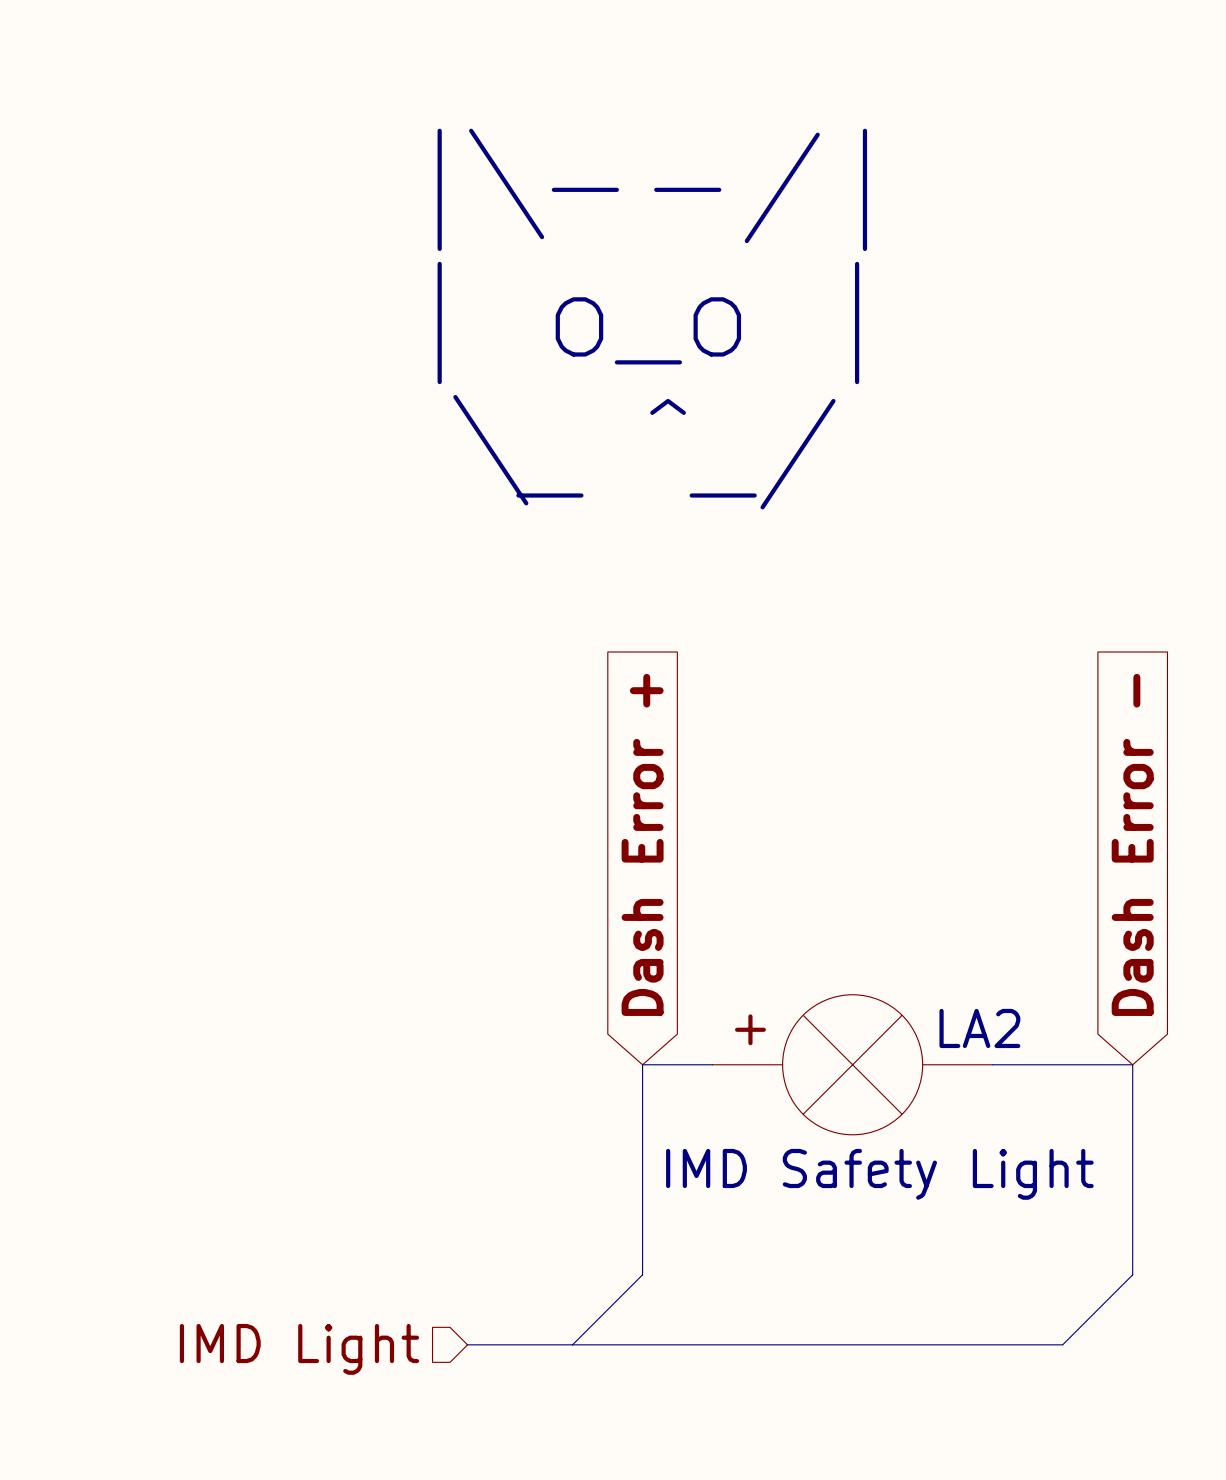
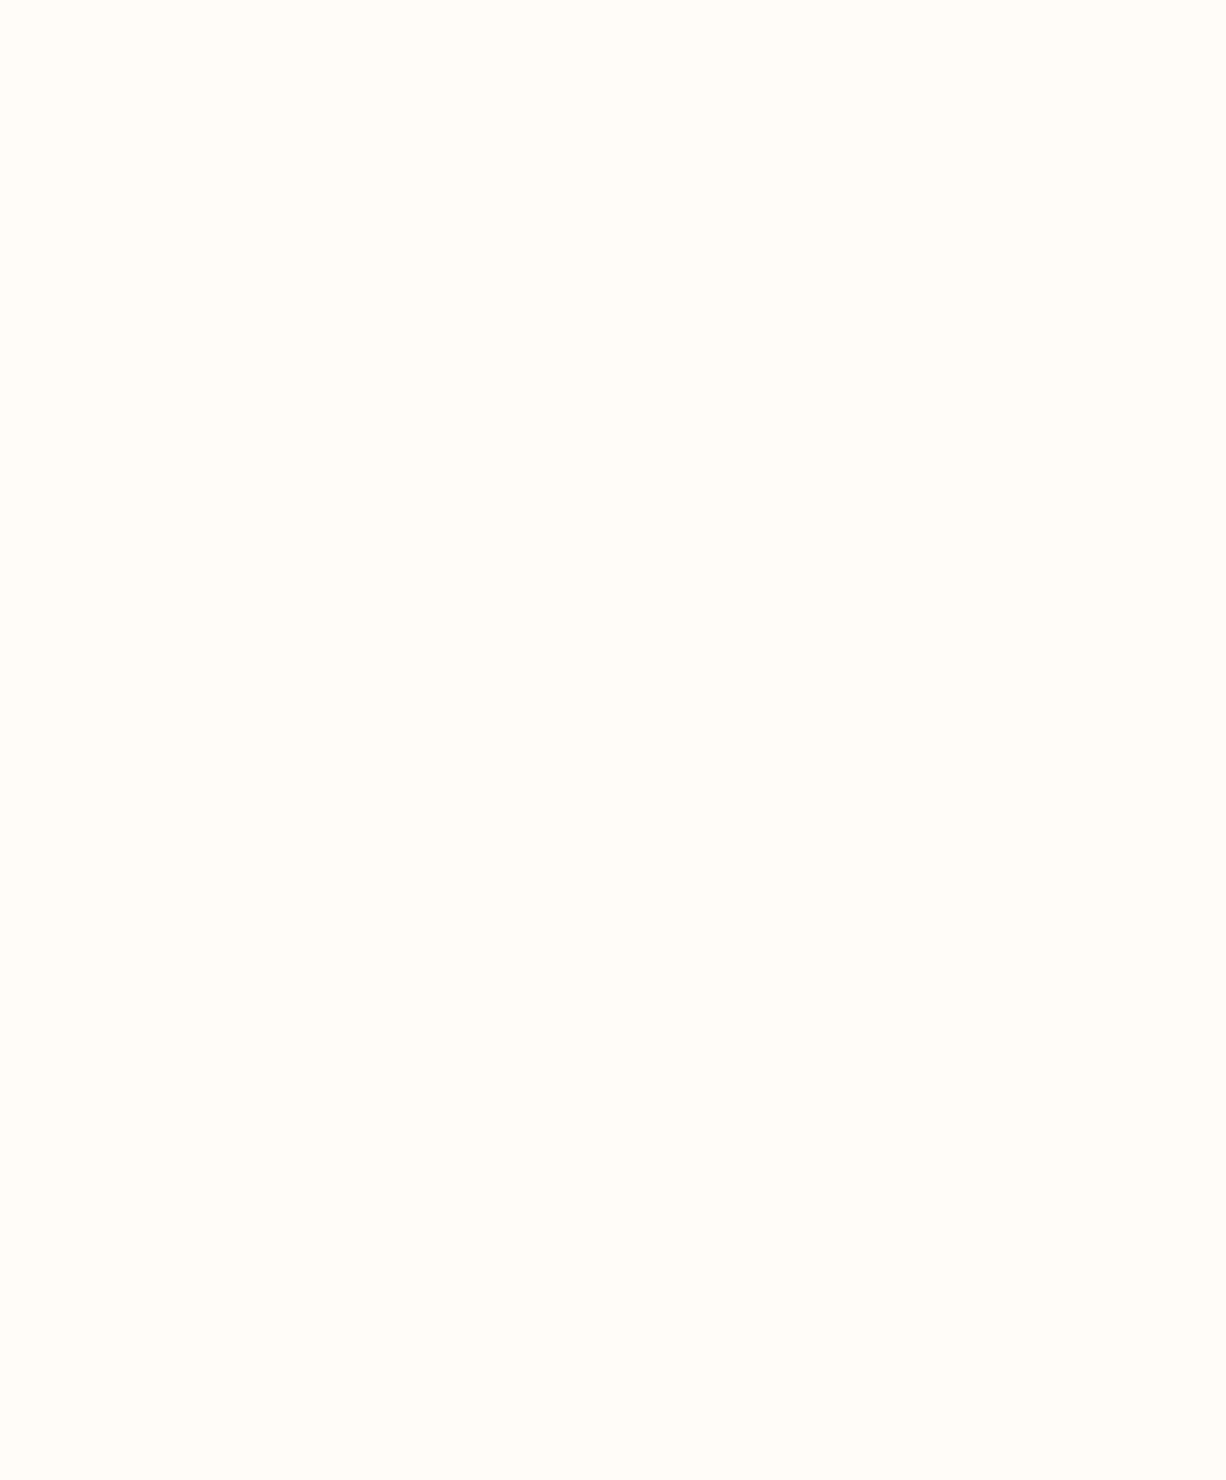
text: |\--/| (652, 189) -> none
text: | o_o | (648, 322) -> none
text: \_ ^_/ (644, 452) -> none
global label: Dash Error + (642, 844) -> none
global label: Dash Error - (1132, 844) -> none
wire: (712, 1064) (642, 1064) (642, 1274) (572, 1344) -> none
LA2: IMD Safety Light (852, 1064) -> none
wire: (992, 1064) (1132, 1064) (1132, 1274) (1062, 1344) -> none
bus: (467, 1344) (1062, 1344) -> none
hierarchical label: IMD Light (299, 1349) -> none

